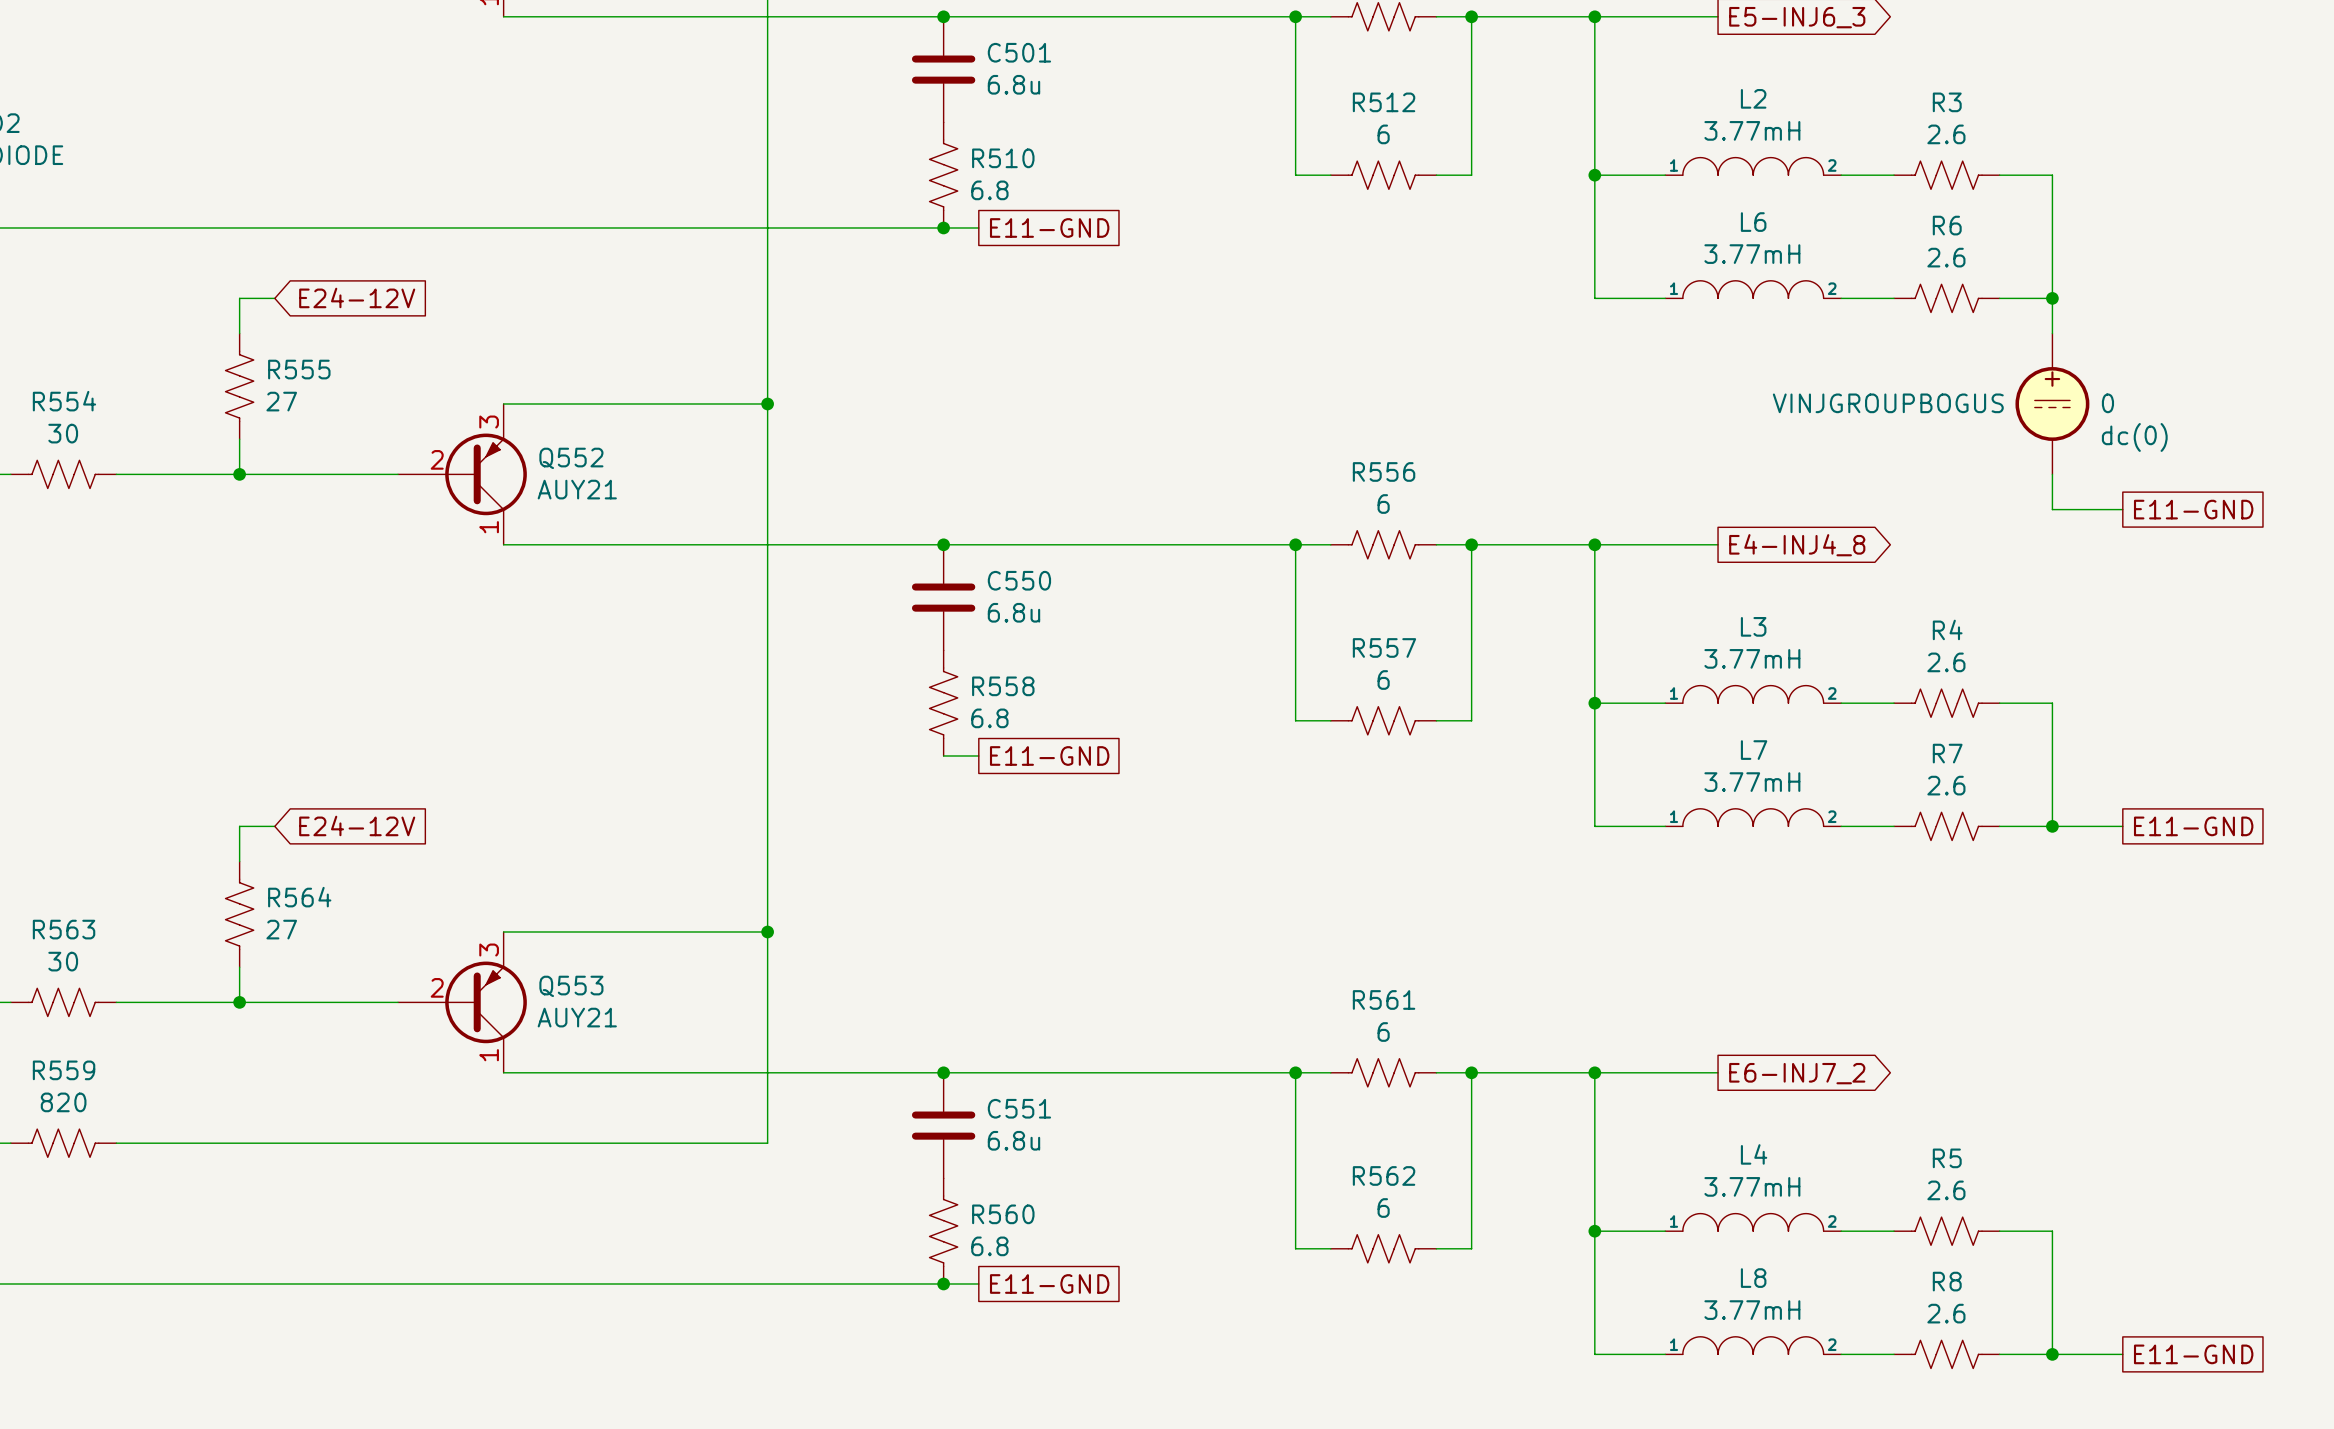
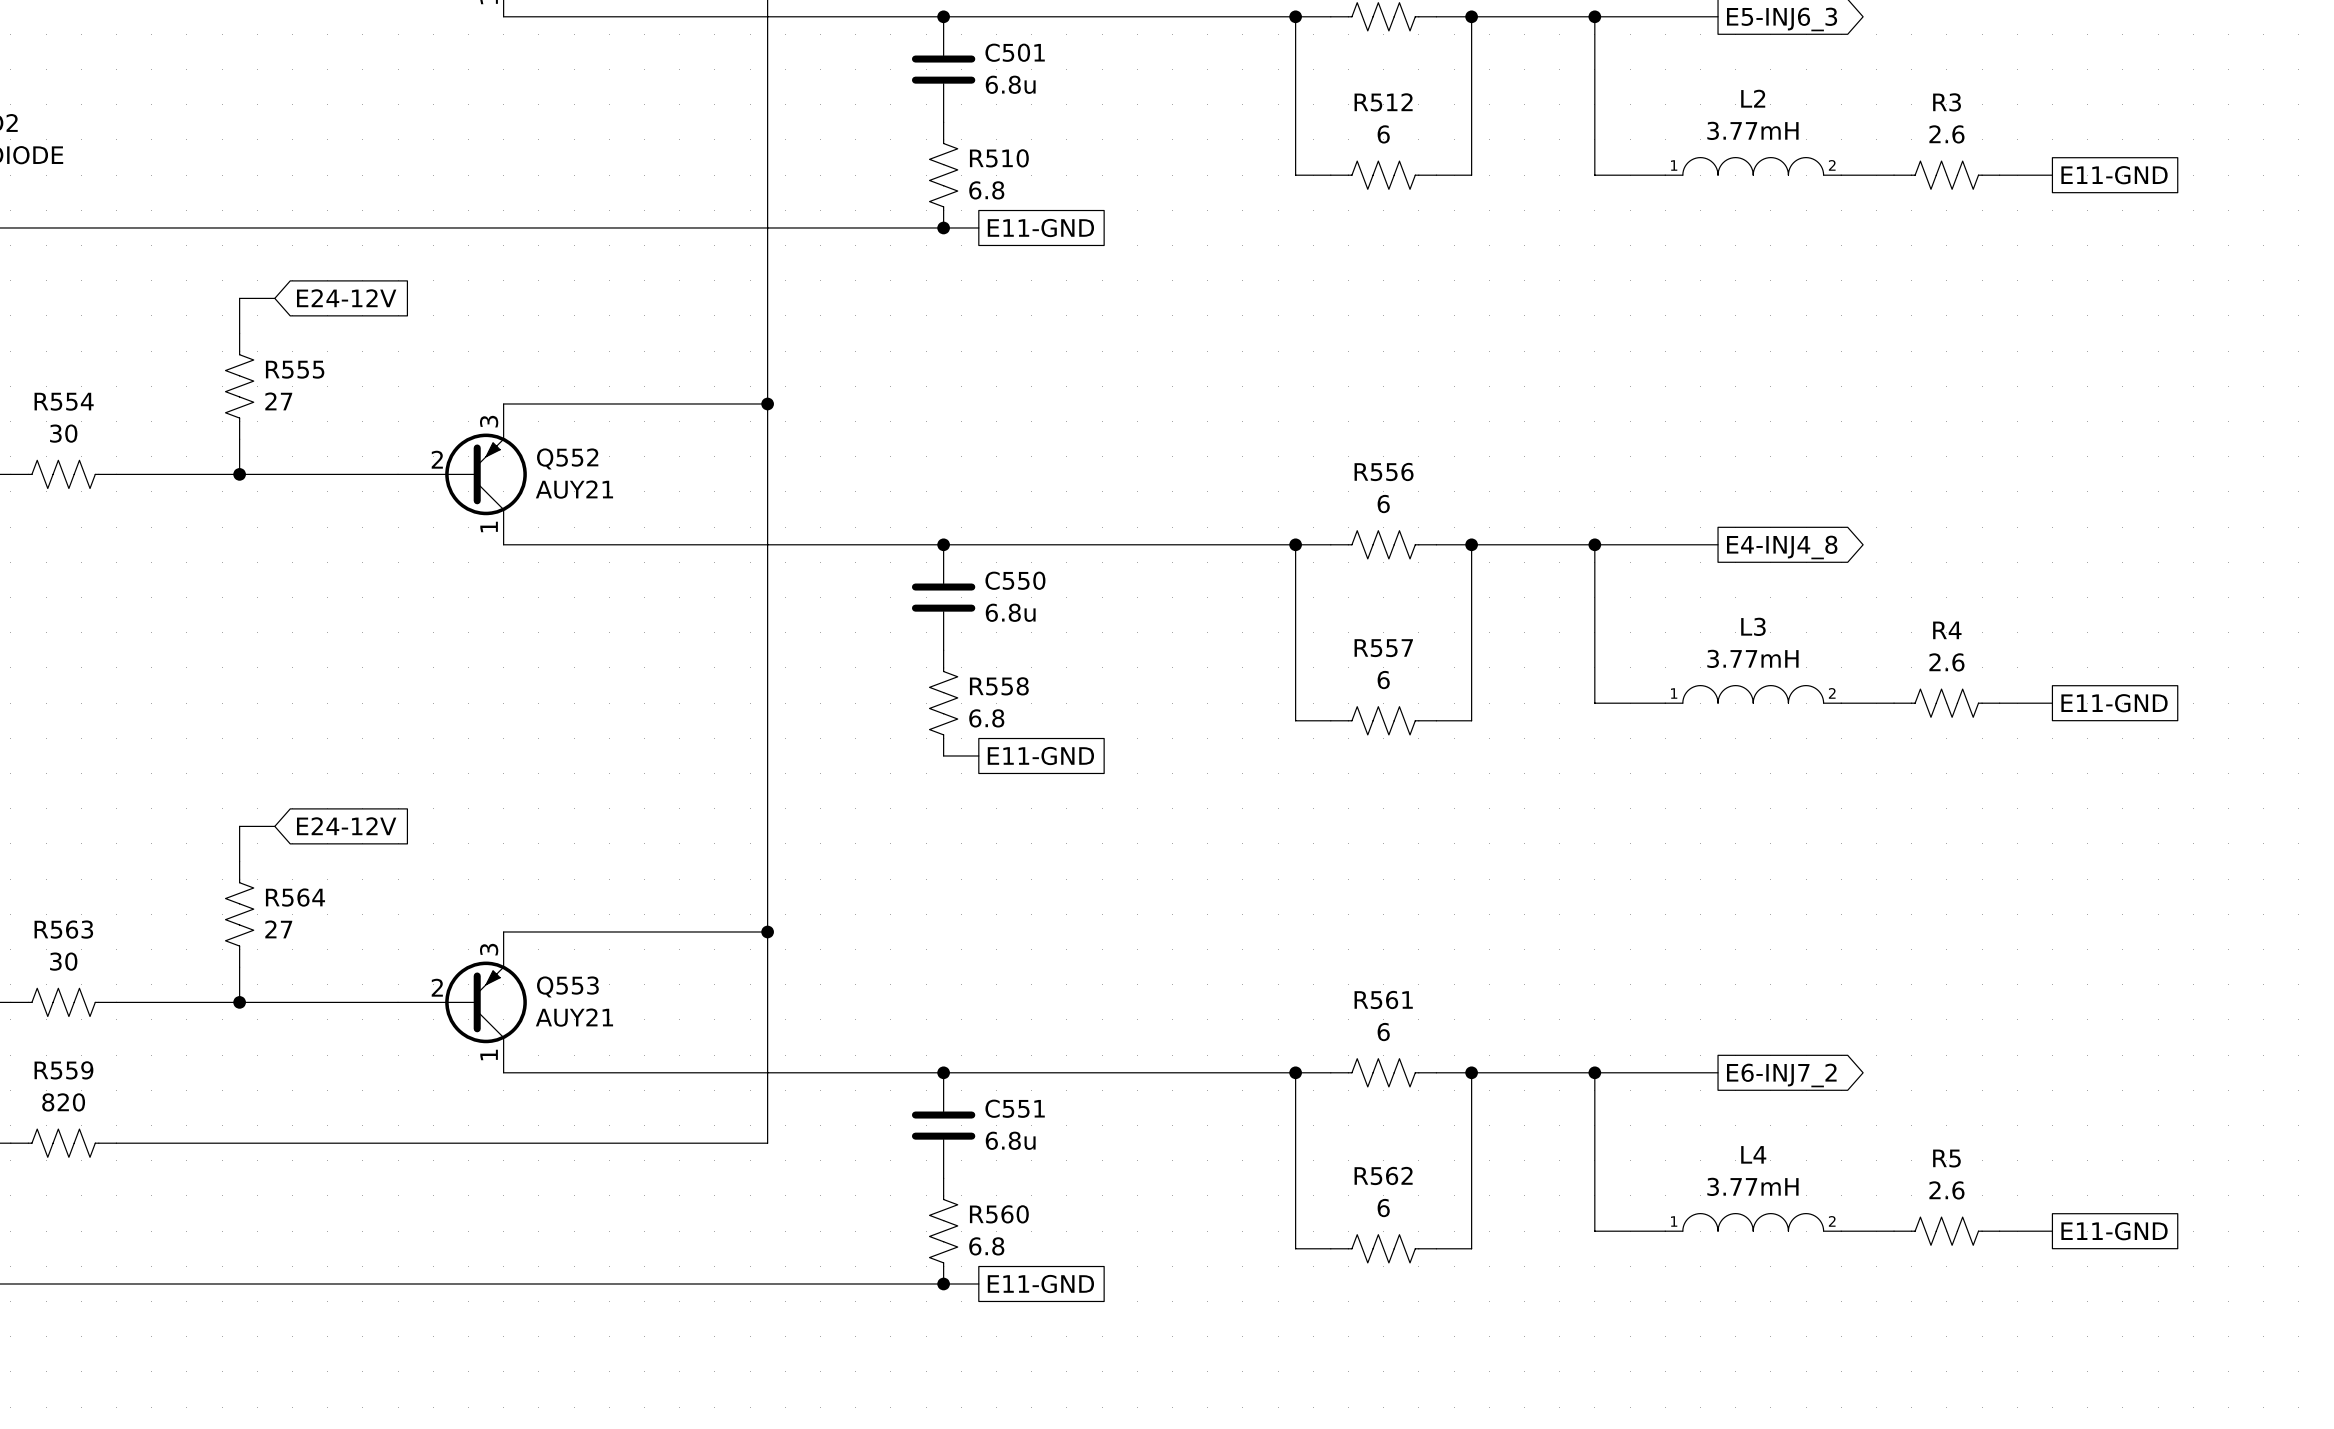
wire: (1594, 175) (1594, 298) (1665, 298) -> none
junction: (1594, 175) -> none
wire: (2052, 175) (2052, 333) -> none
global label: none -> E11-GND (2114, 175)
L6: 3.77mH (1753, 289) -> none
wire: (1841, 298) (1894, 298) -> none
R6: 2.6 (1946, 298) -> none
wire: (1999, 298) (2052, 298) -> none
junction: (2052, 298) -> none
VINJGROUPBOGUS: 0 (2052, 403) -> none
wire: (2052, 474) (2052, 509) (2122, 509) -> none
global label: E11-GND (2193, 509) -> none
wire: (1594, 703) (1594, 826) (1665, 826) -> none
junction: (1594, 703) -> none
wire: (2052, 703) (2052, 826) -> none
global label: none -> E11-GND (2114, 703)
L7: 3.77mH (1753, 817) -> none
wire: (1841, 826) (1894, 826) -> none
R7: 2.6 (1946, 826) -> none
wire: (1999, 826) (2122, 826) -> none
junction: (2052, 826) -> none
global label: E11-GND (2193, 826) -> none
wire: (1594, 1231) (1594, 1354) (1665, 1354) -> none
junction: (1594, 1231) -> none
wire: (2052, 1231) (2052, 1354) -> none
L8: 3.77mH (1753, 1345) -> none
wire: (1841, 1354) (1894, 1354) -> none
R8: 2.6 (1946, 1354) -> none
wire: (1999, 1354) (2122, 1354) -> none
junction: (2052, 1354) -> none
global label position: E11-GND (2193, 1354) -> E11-GND (2114, 1231)

